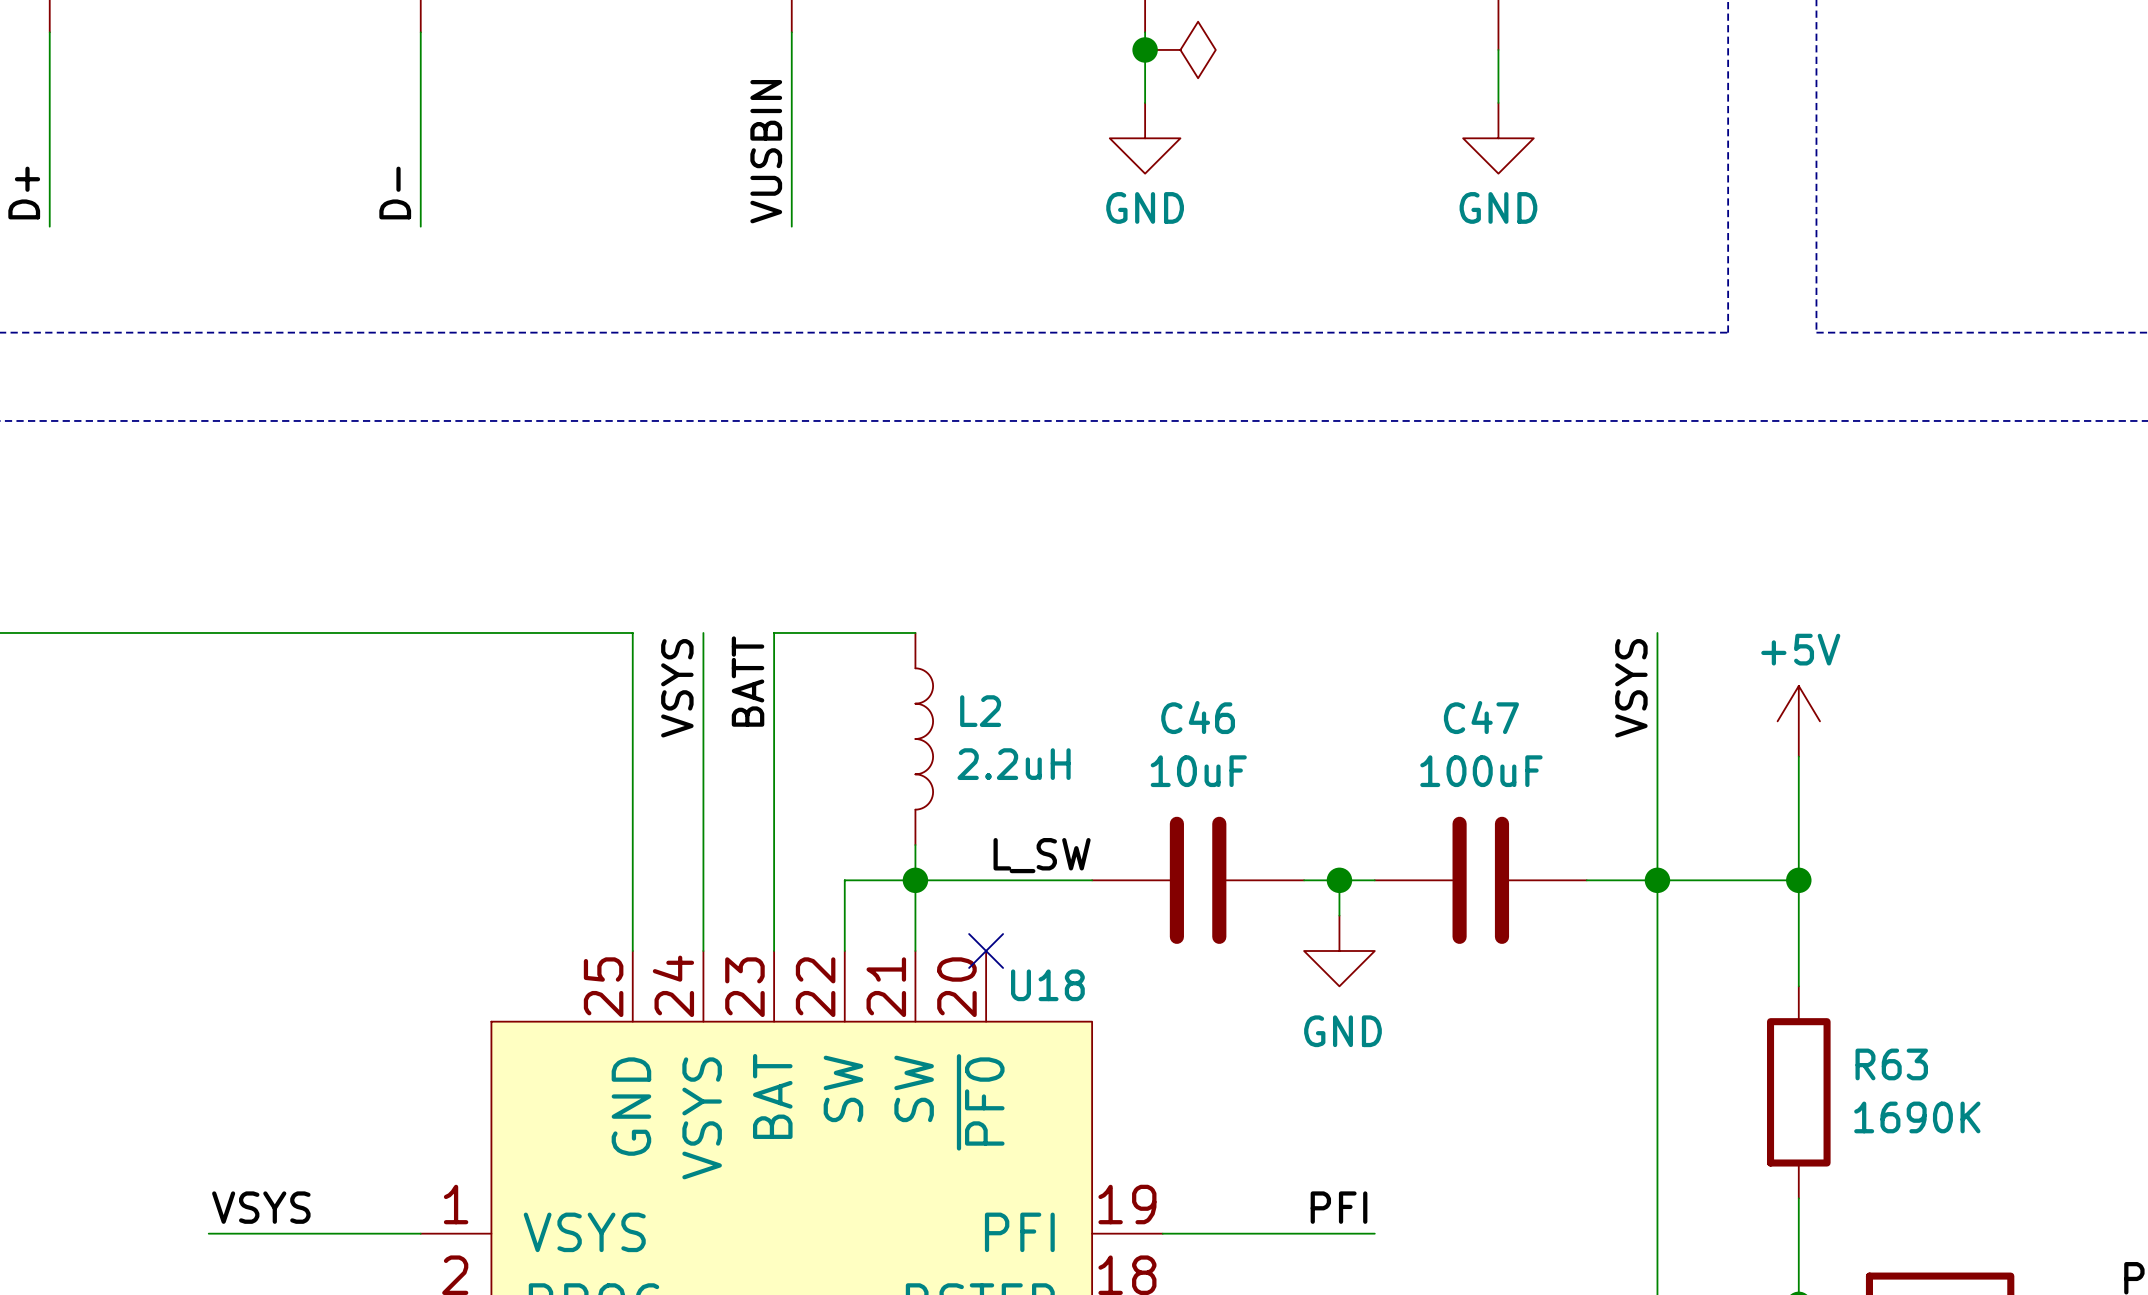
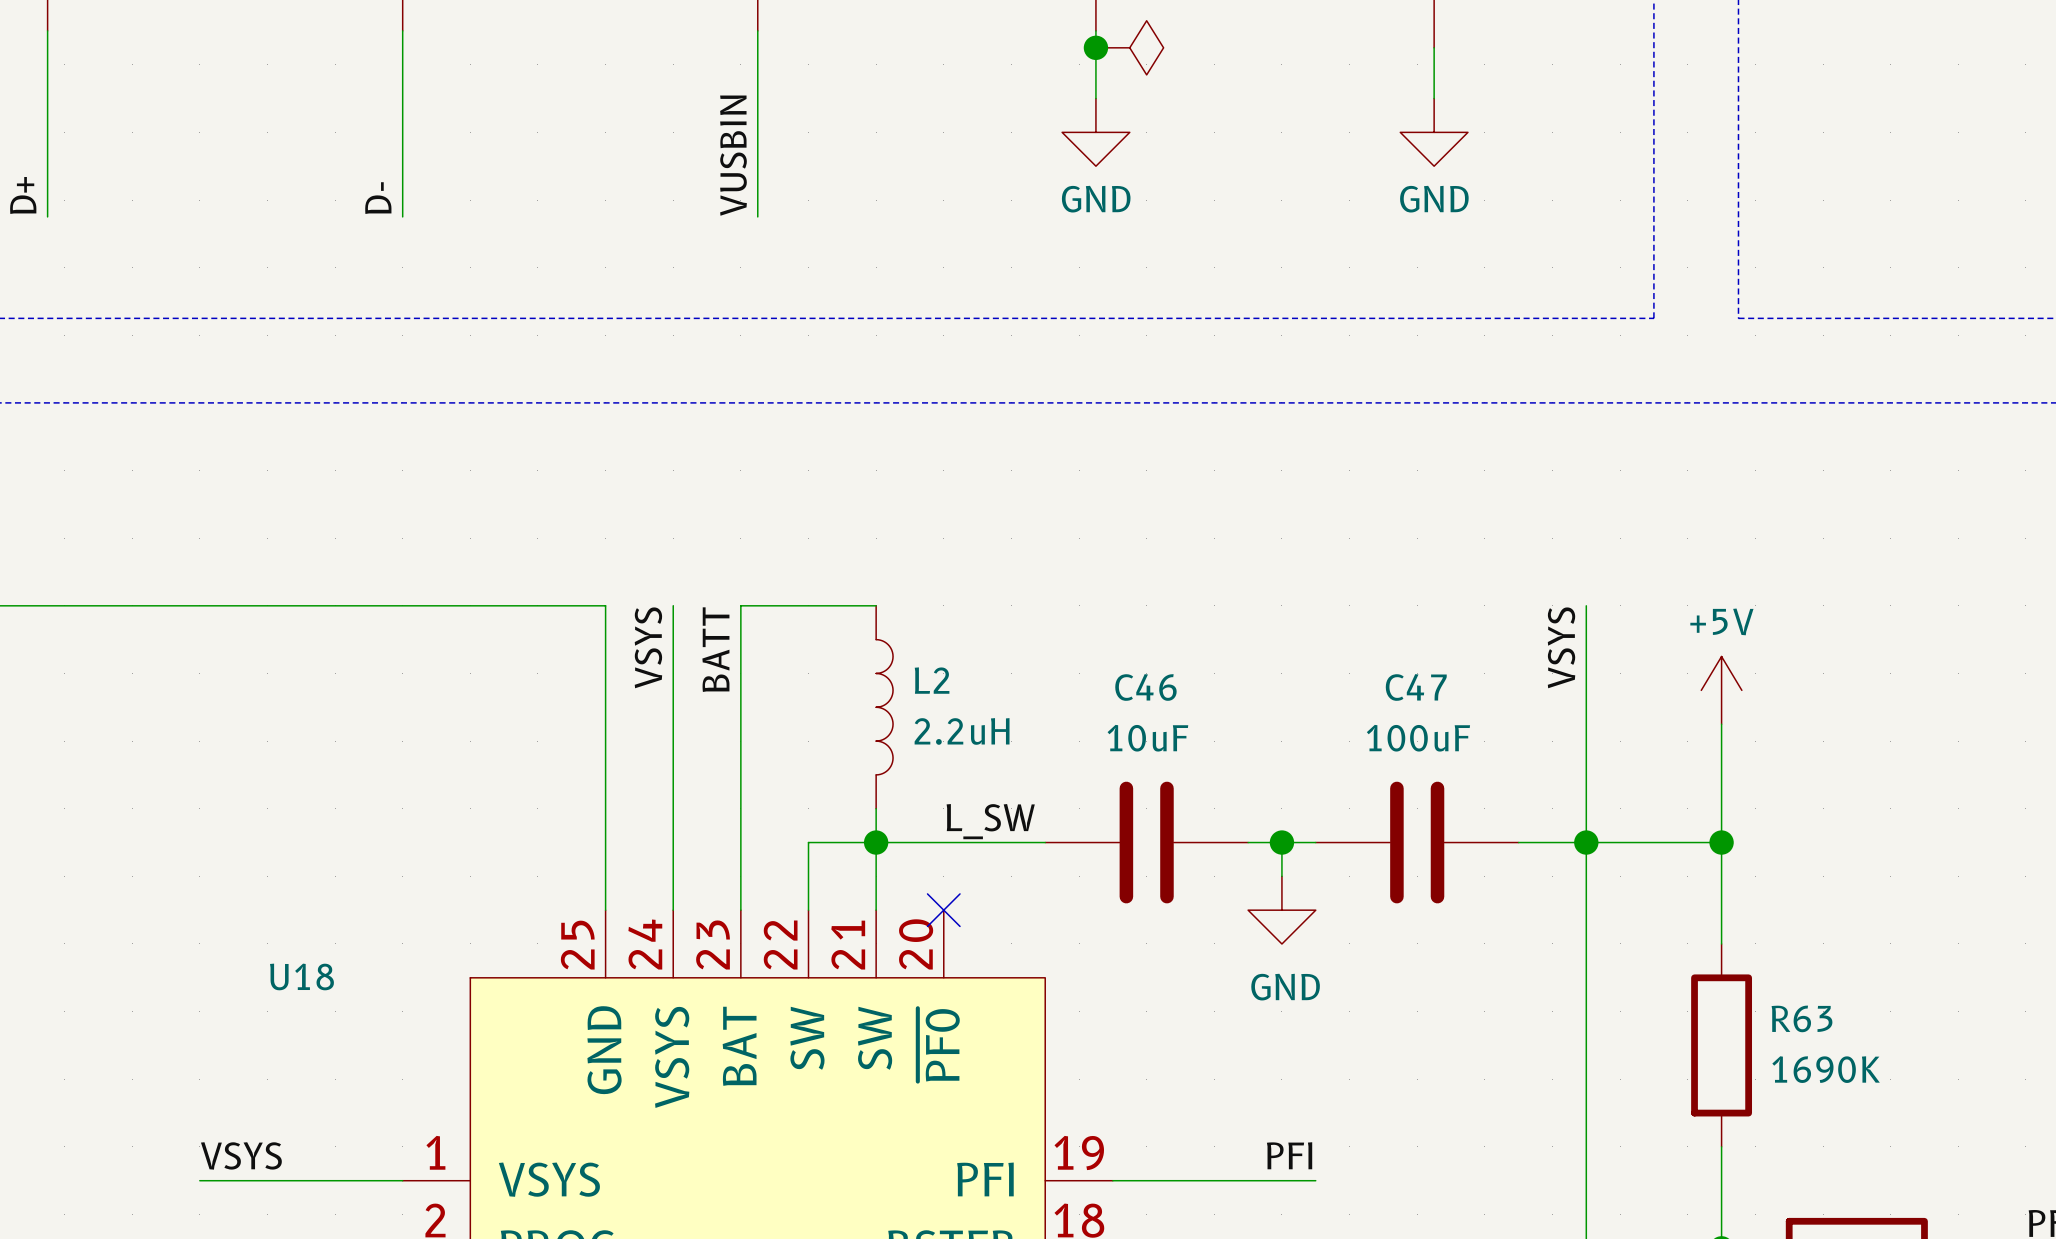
U18 name position: U18 (1047, 985) -> U18 (301, 976)

